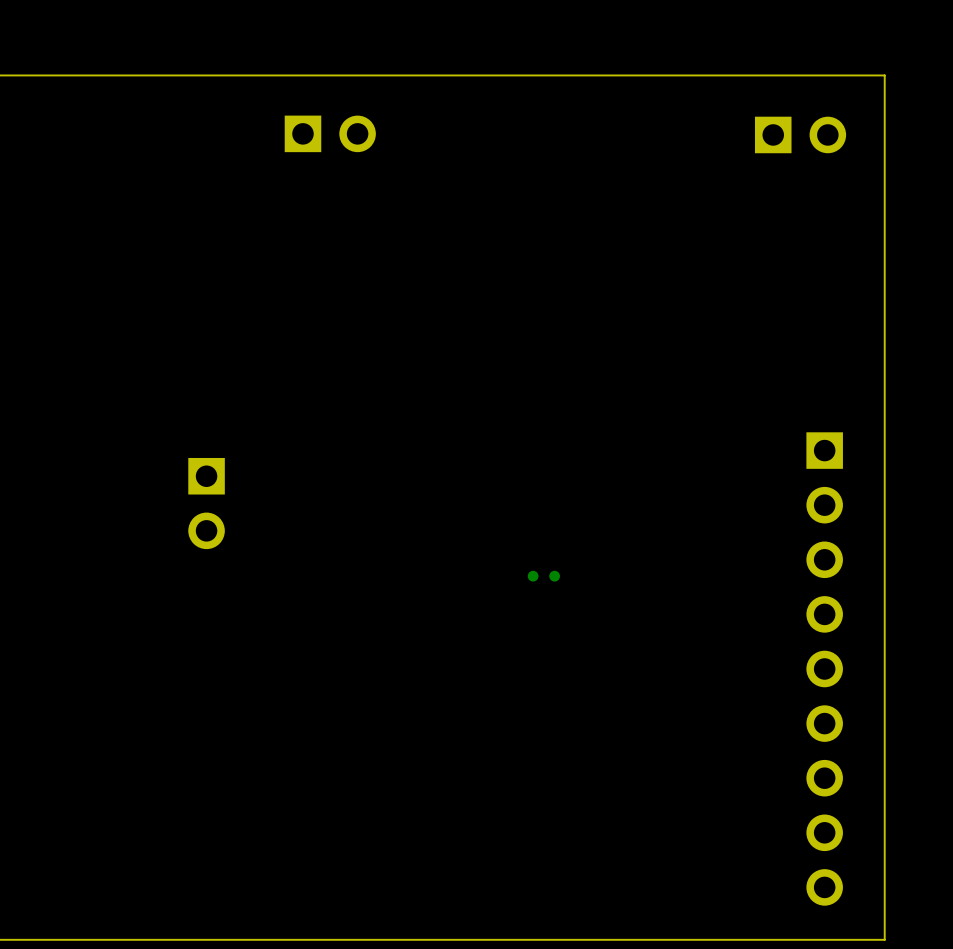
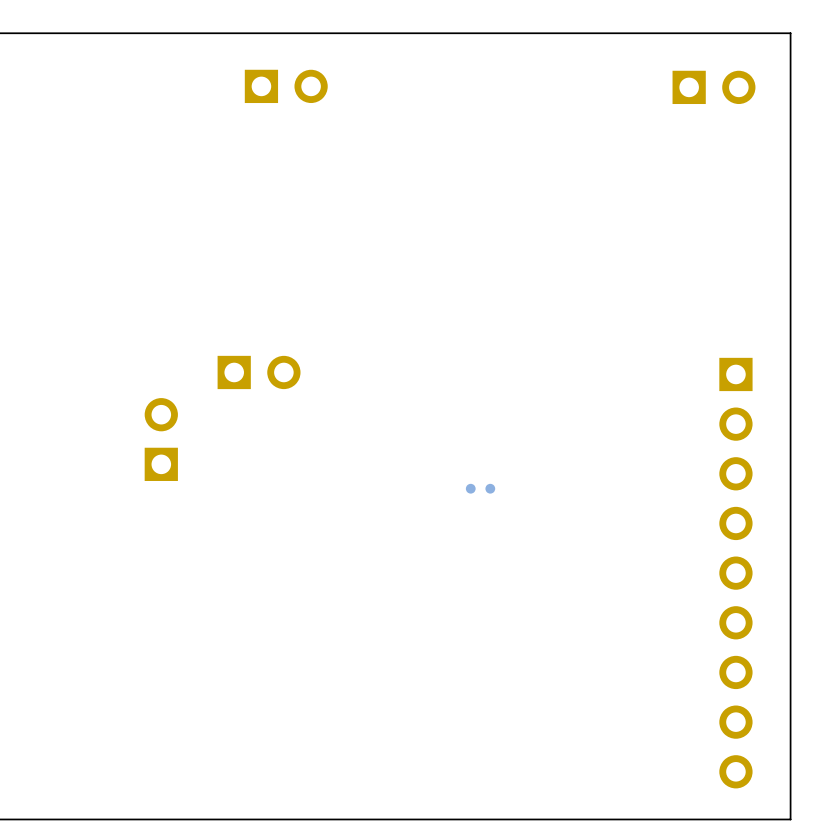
part: none -> (259, 372)
part rotation: 0° (206, 503) -> 180° (161, 439)

